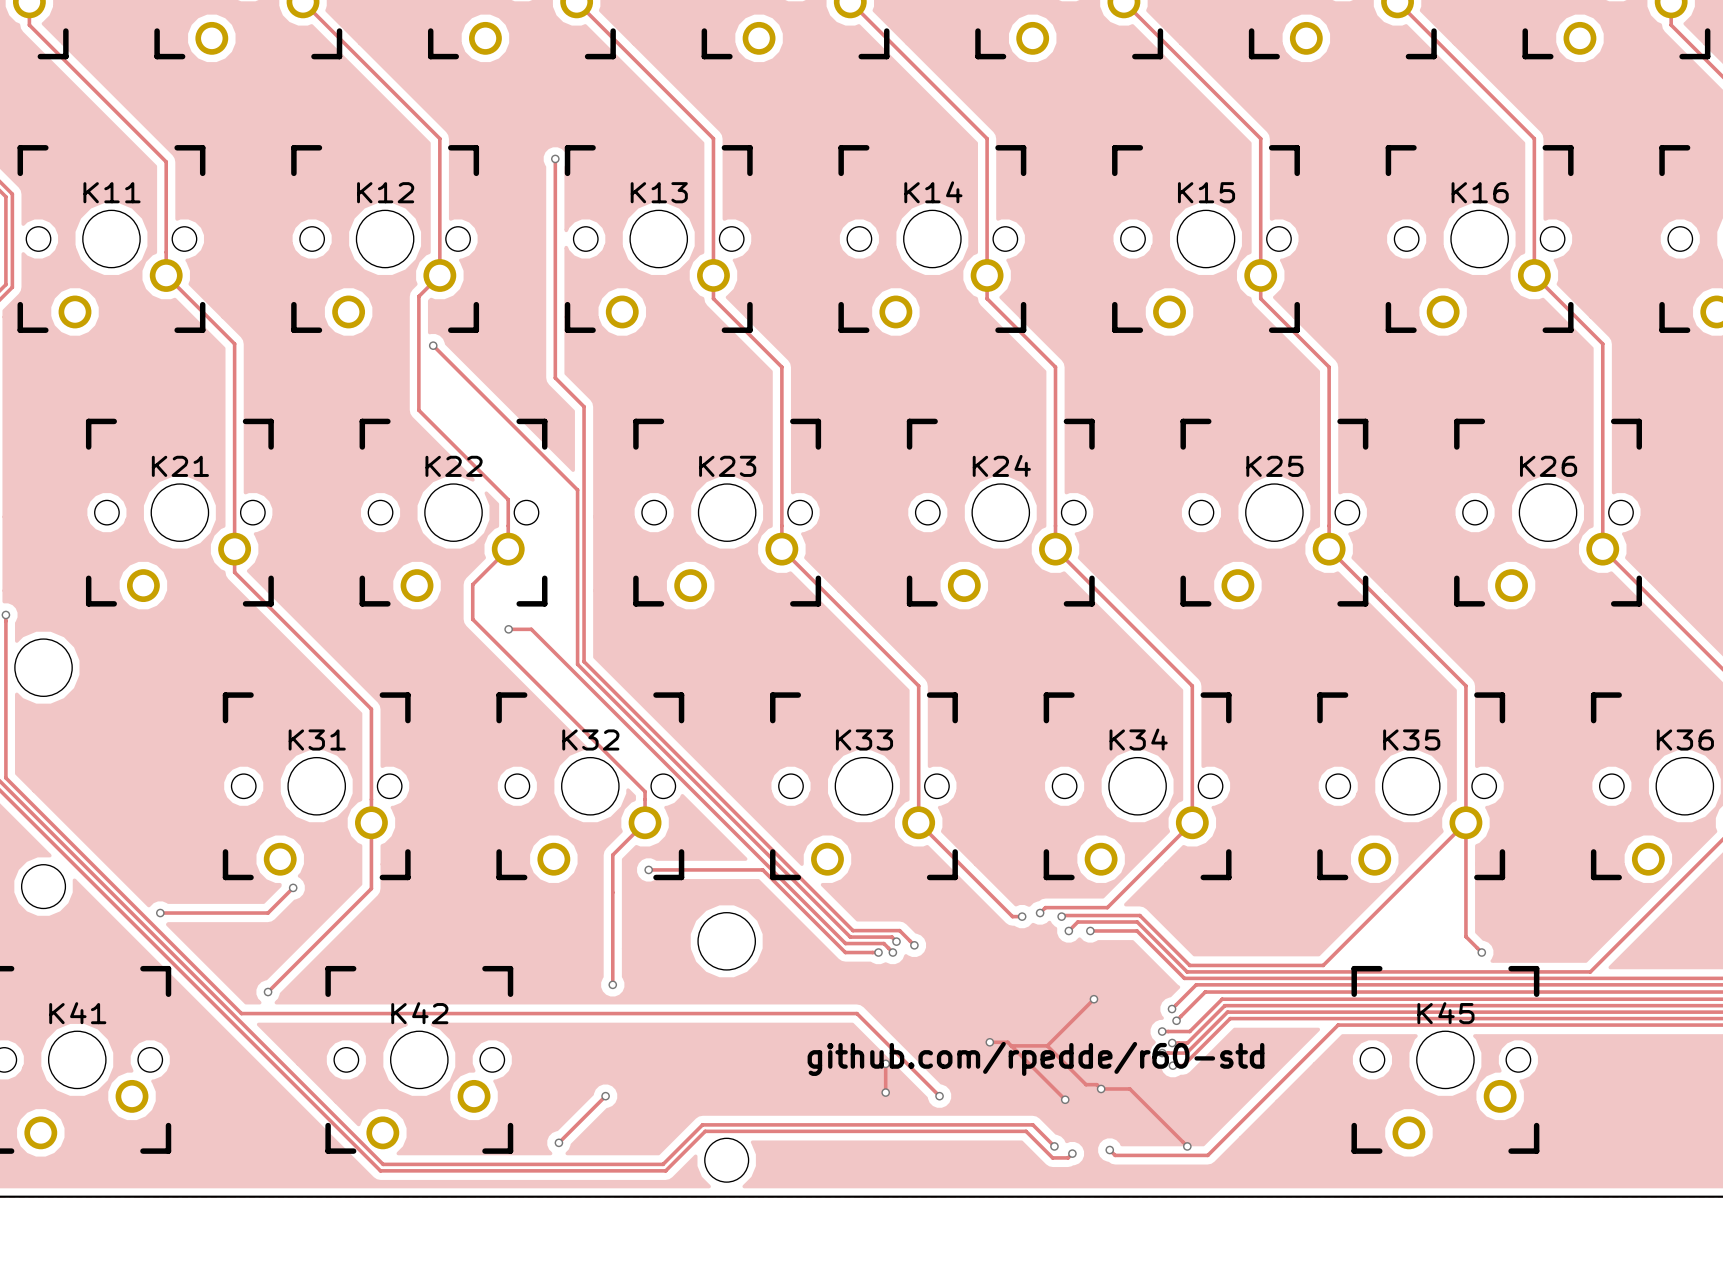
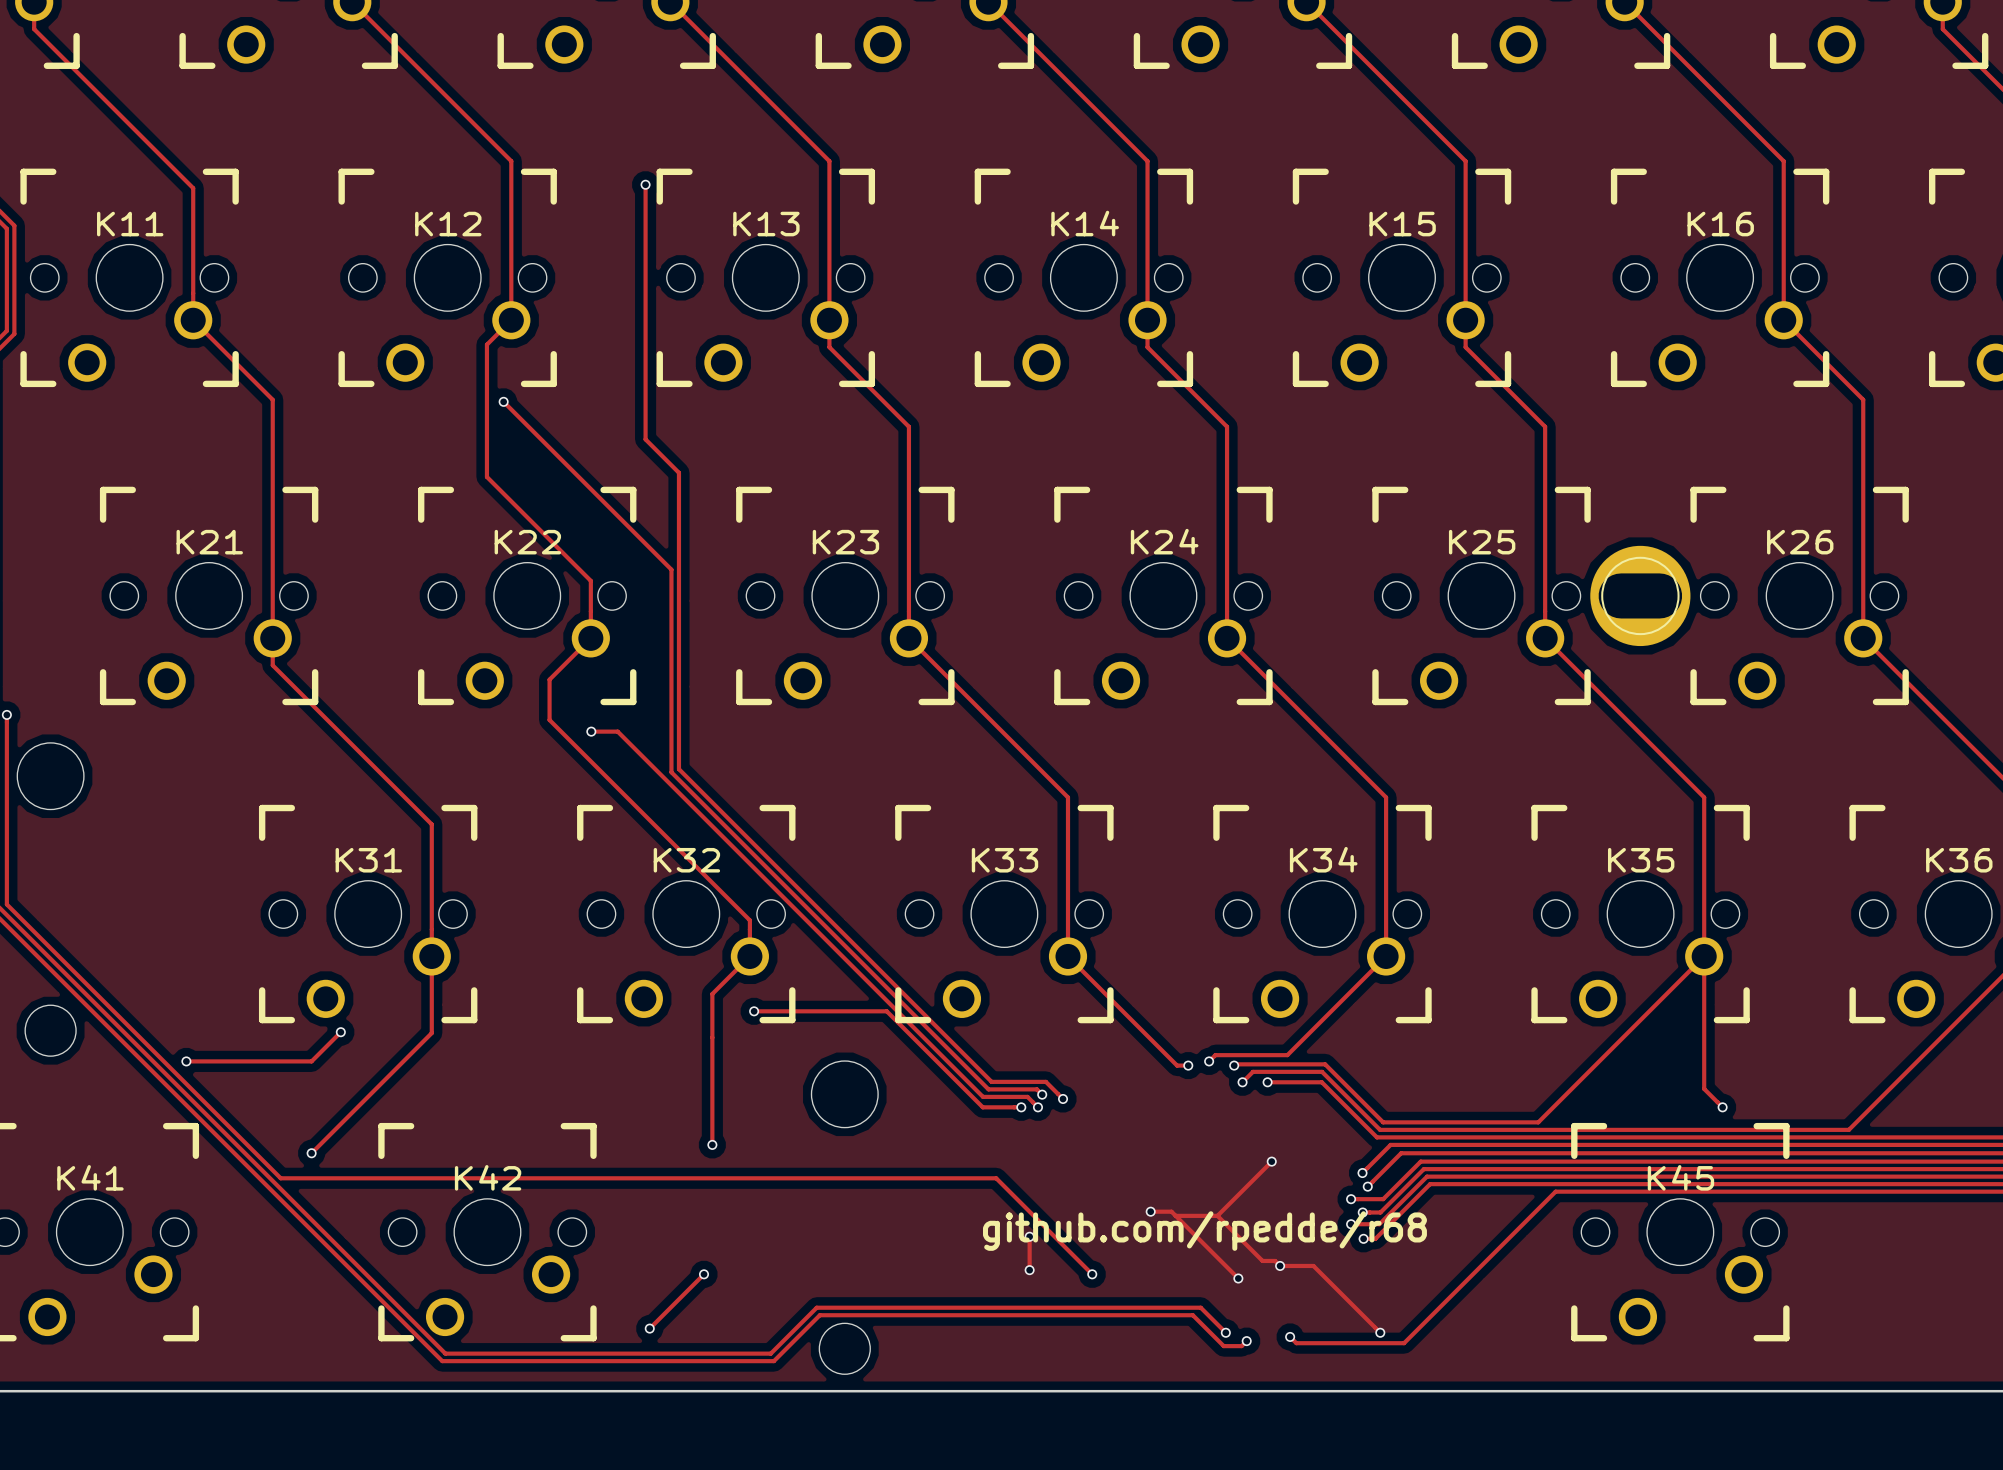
part: none -> (1640, 595)
text: github.com/rpedde/r60-std (1035, 1058) -> github.com/rpedde/r68 (1204, 1231)

